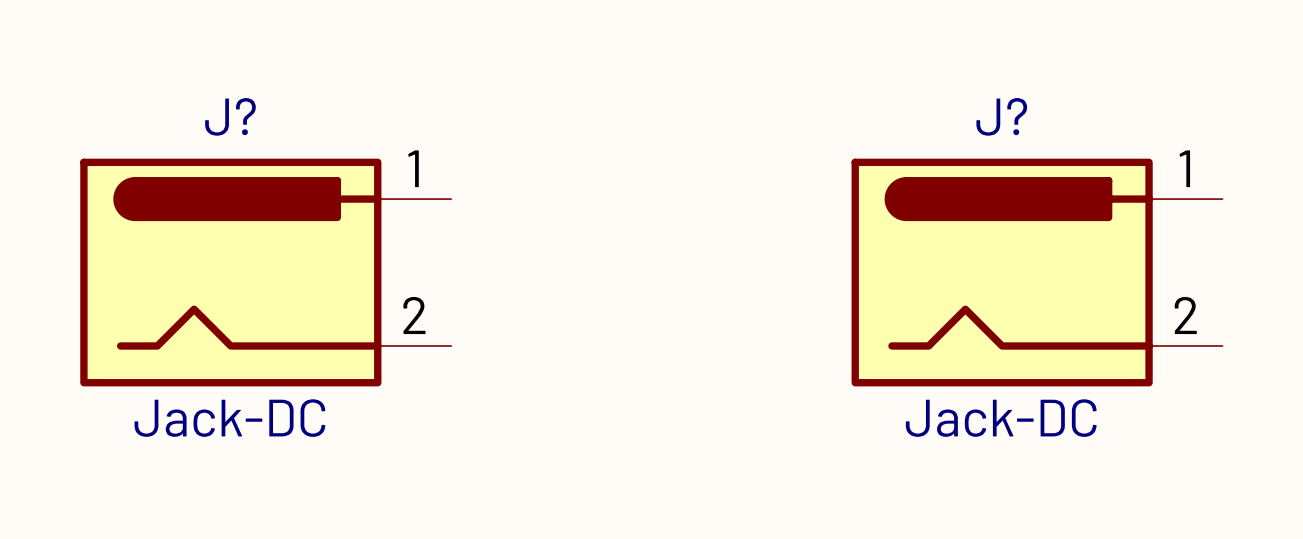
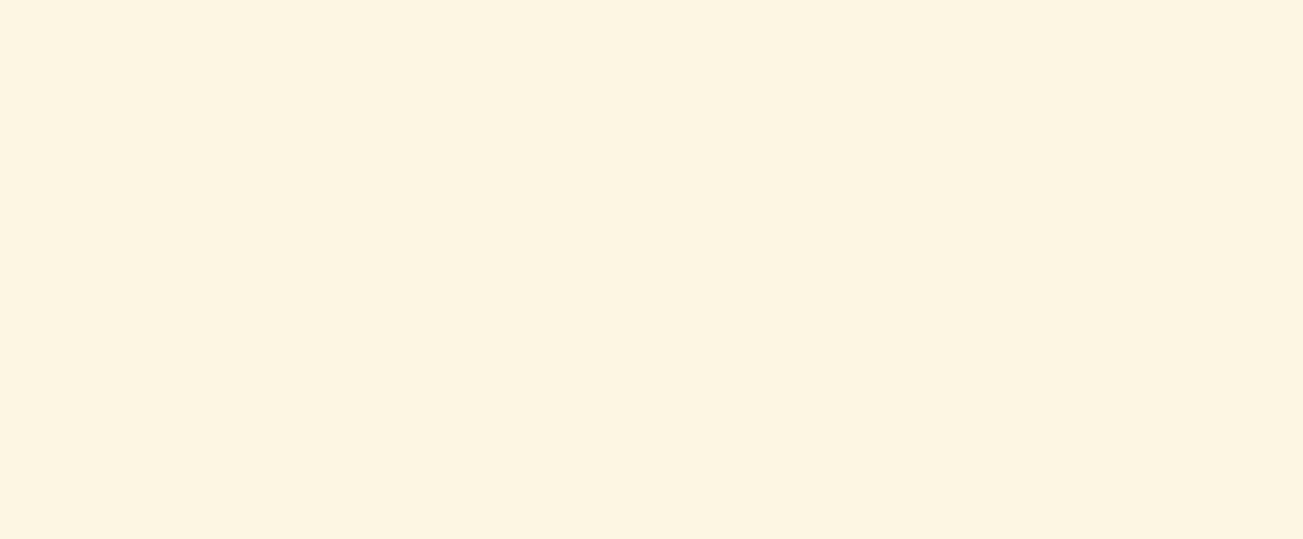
J?: Jack-DC (265, 272) -> none
J?: Jack-DC (1037, 272) -> none

